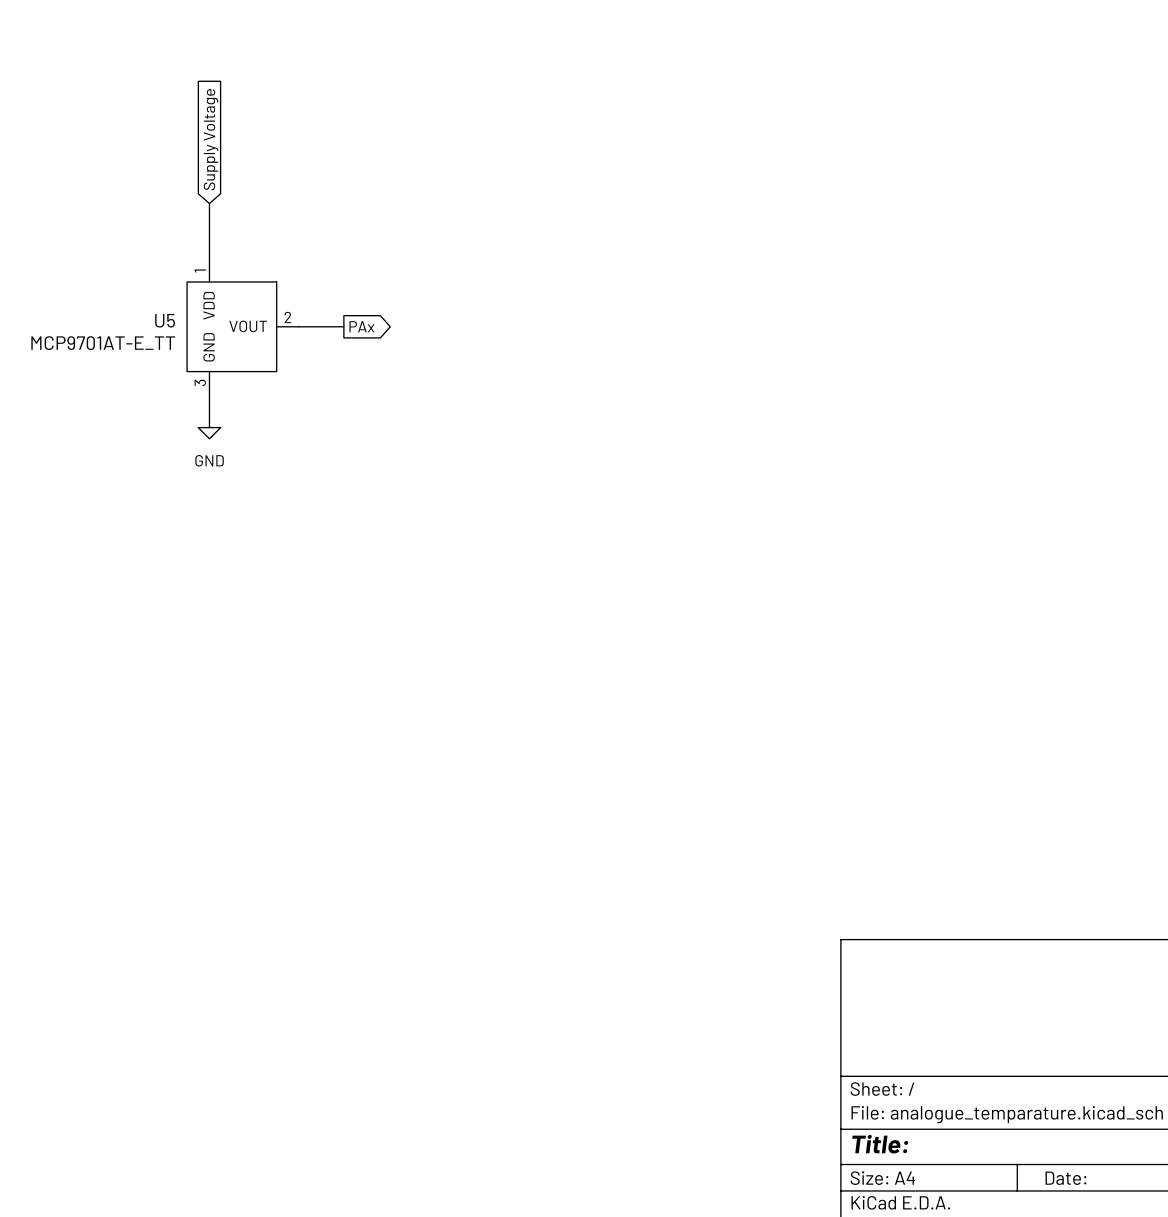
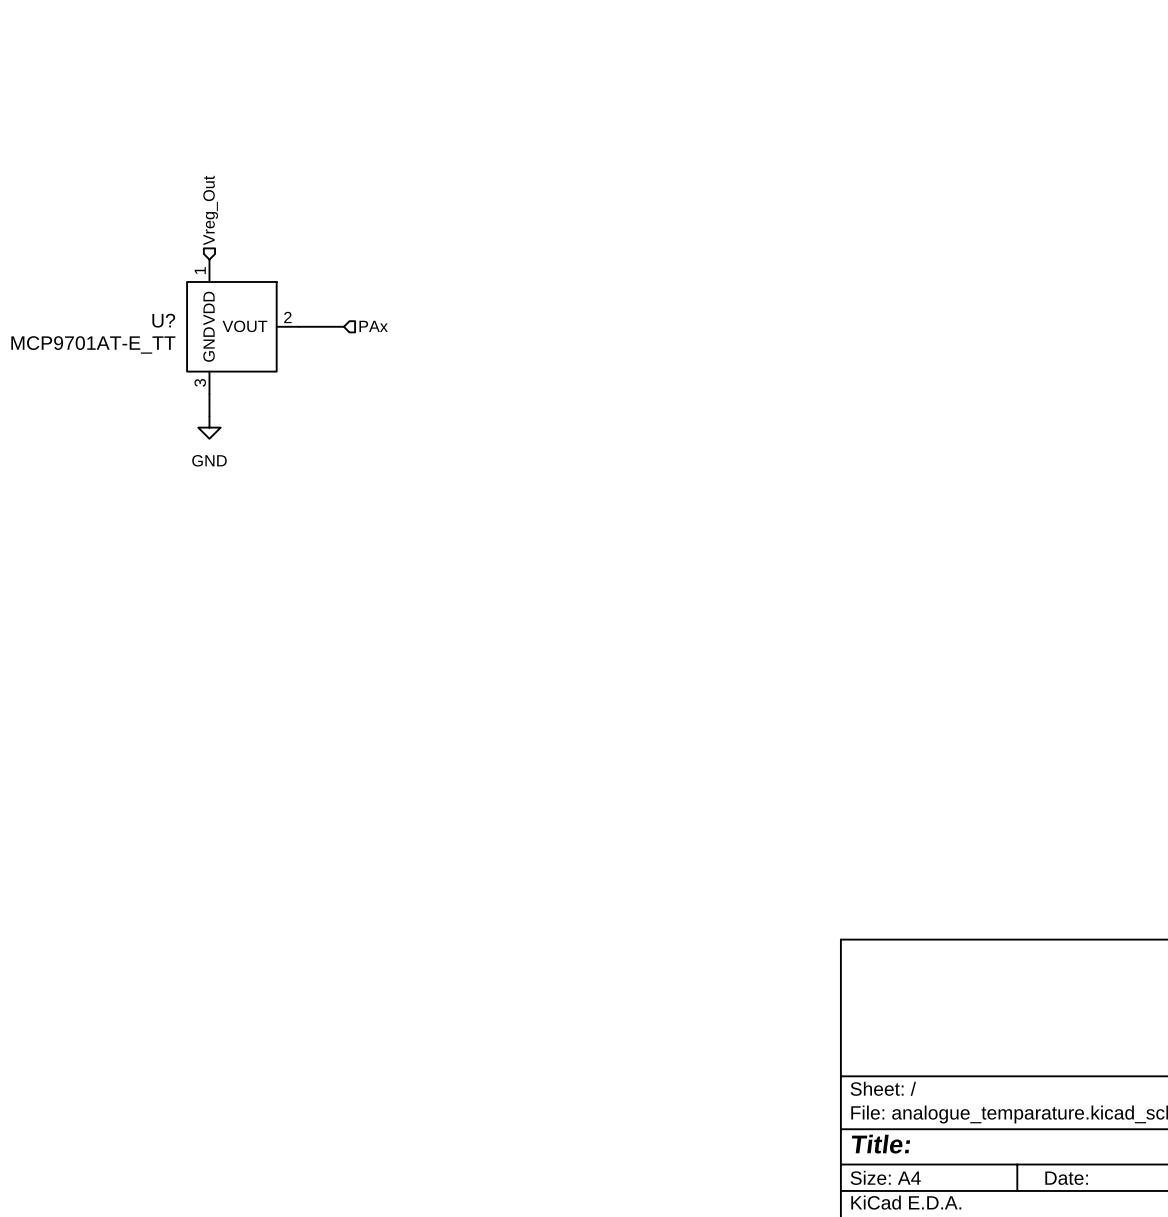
global label: Supply Voltage (211, 139) -> none
wire: (209, 203) (209, 259) -> none
hierarchical label: none -> Vreg_Out (210, 210)
U5 name: U5 (165, 320) -> U? (163, 320)
global label: PAx (361, 326) -> none
hierarchical label: none -> PAx (373, 326)

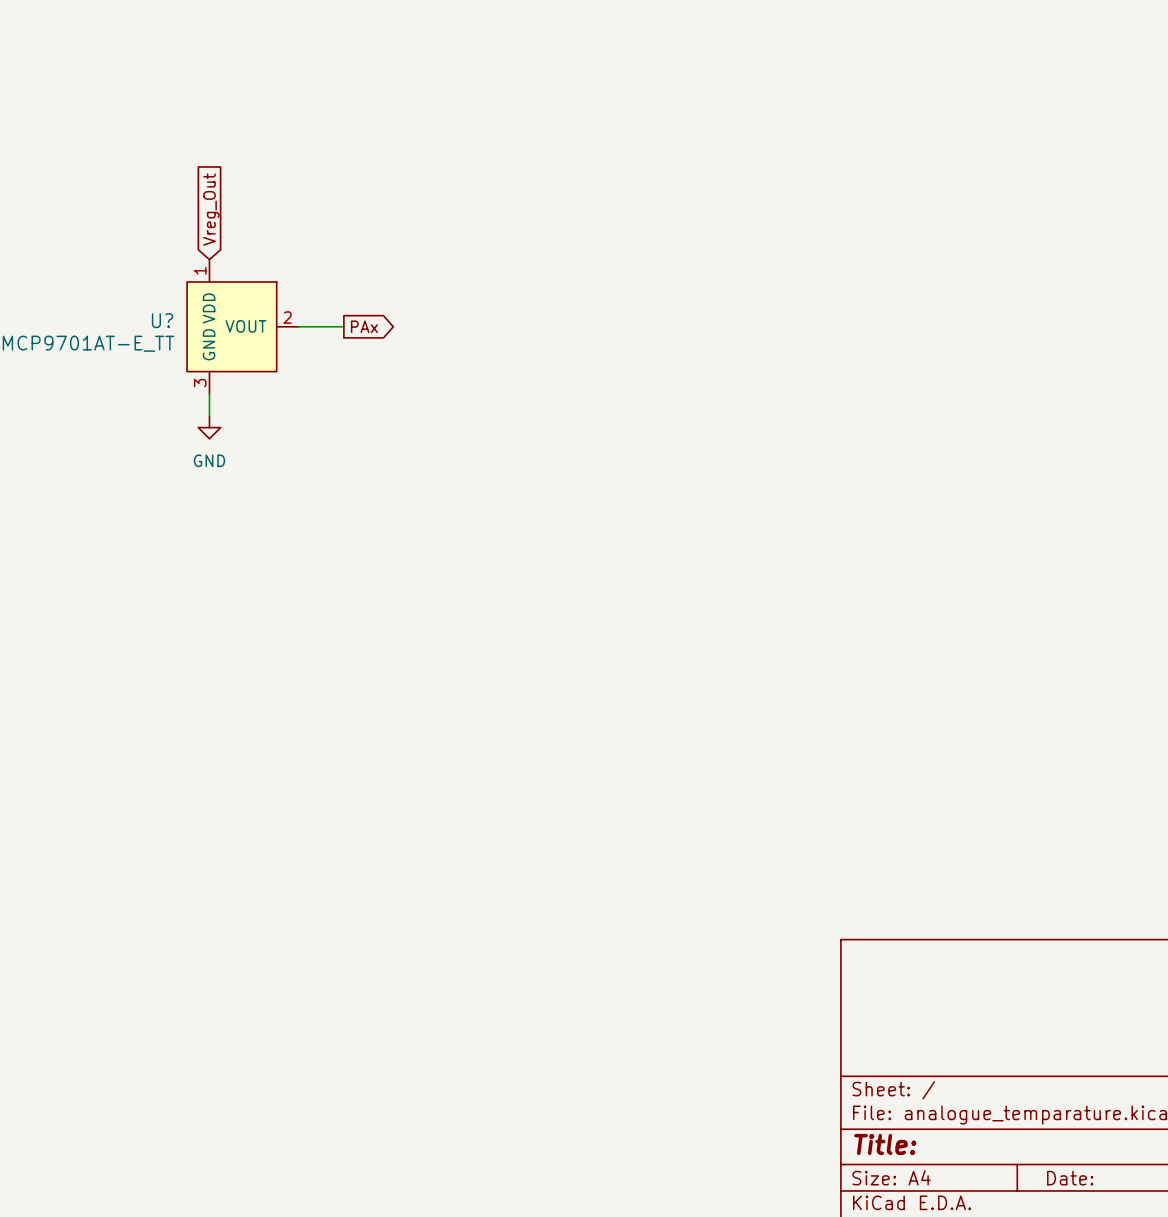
hierarchical label: Vreg_Out (210, 210) -> none
global label: none -> Vreg_Out (211, 209)
global label: none -> PAx (364, 326)
hierarchical label: PAx (373, 326) -> none

